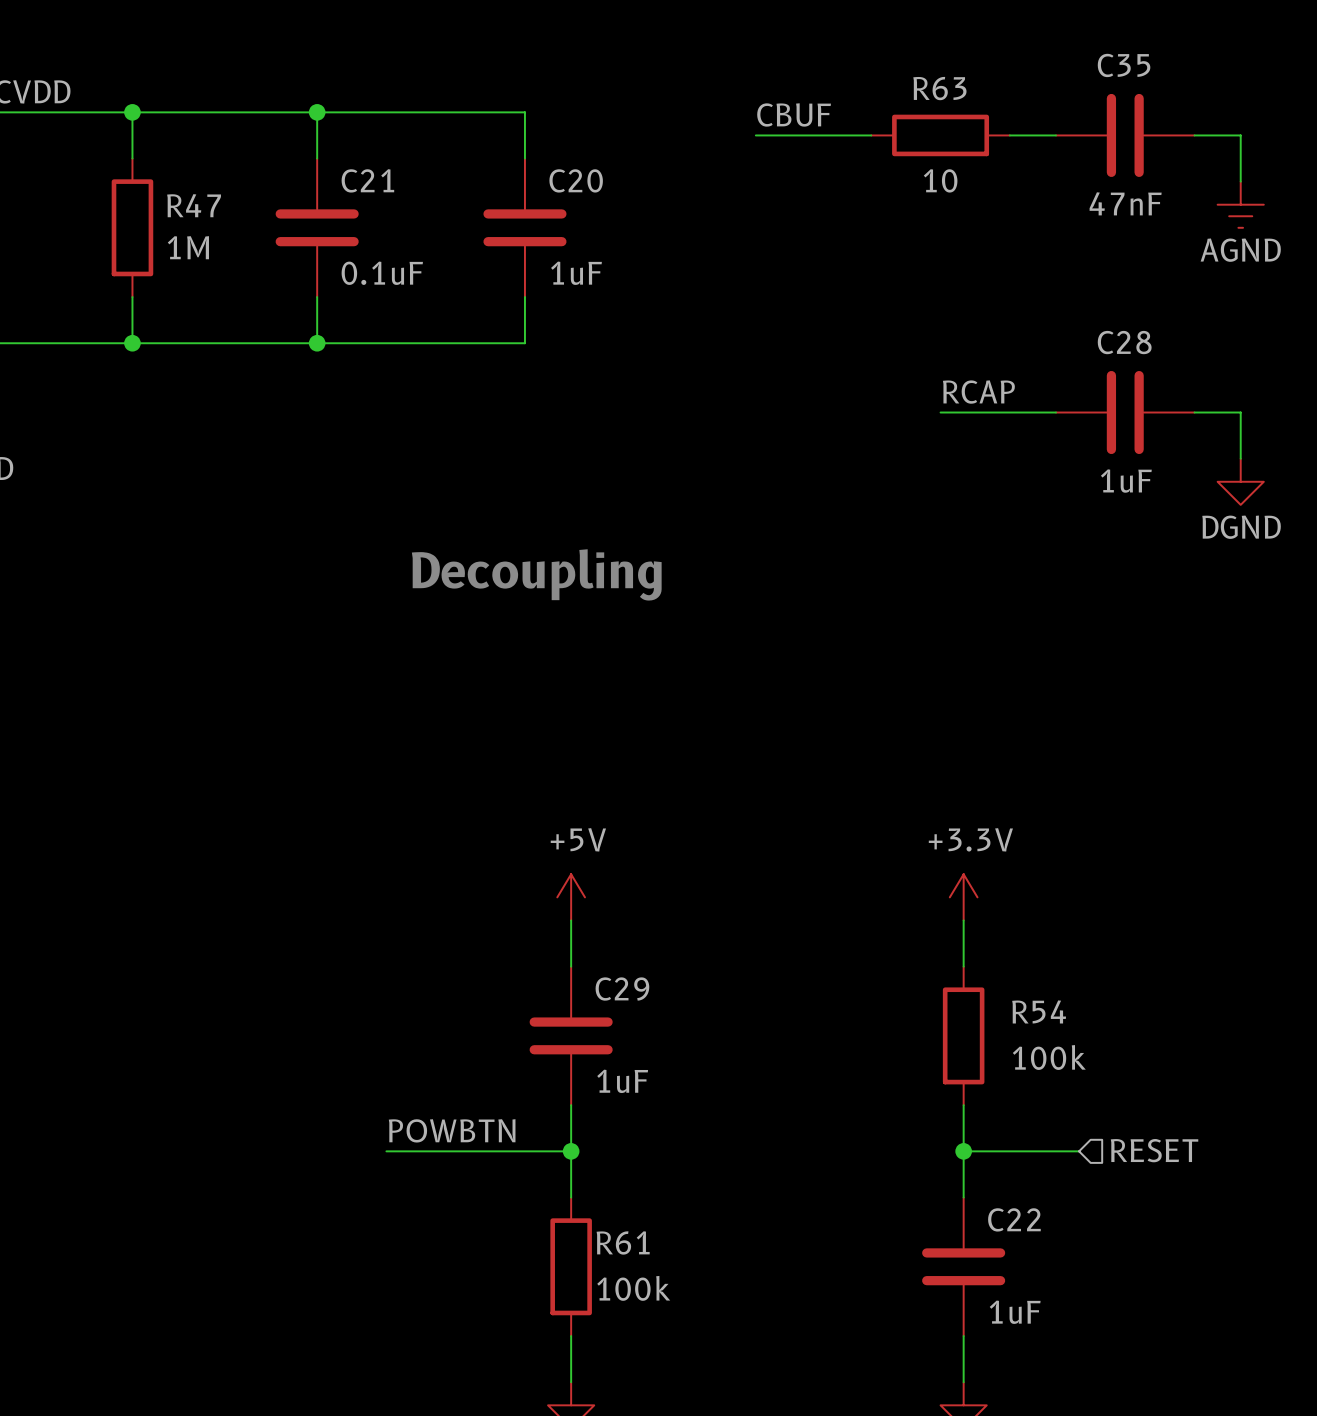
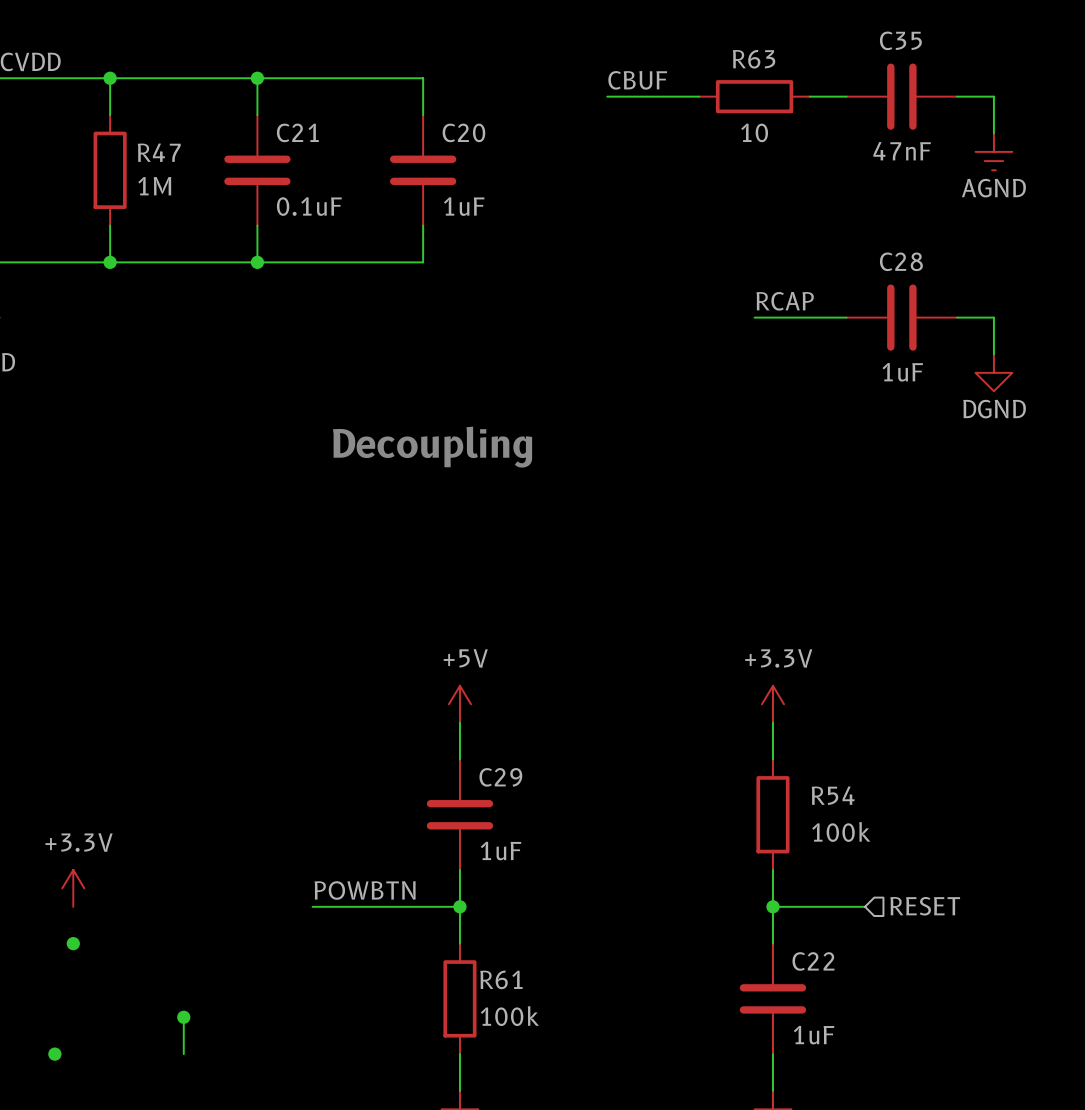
power symbol: none -> +3.3V (73, 888)
junction: none -> (73, 943)
wire: none -> (183, 1017) (183, 1054)
junction: none -> (183, 1017)
junction: none -> (54, 1054)

